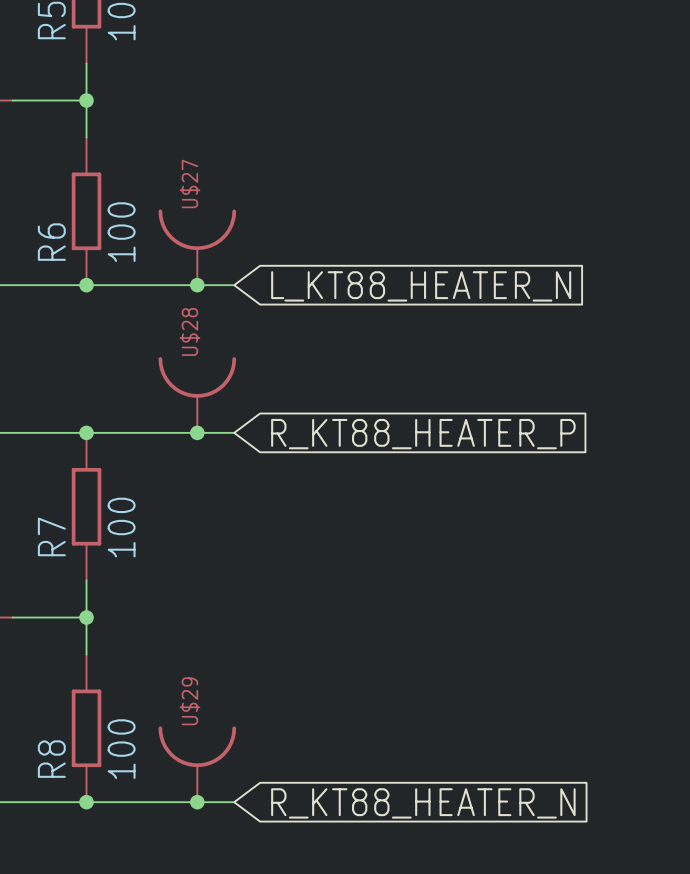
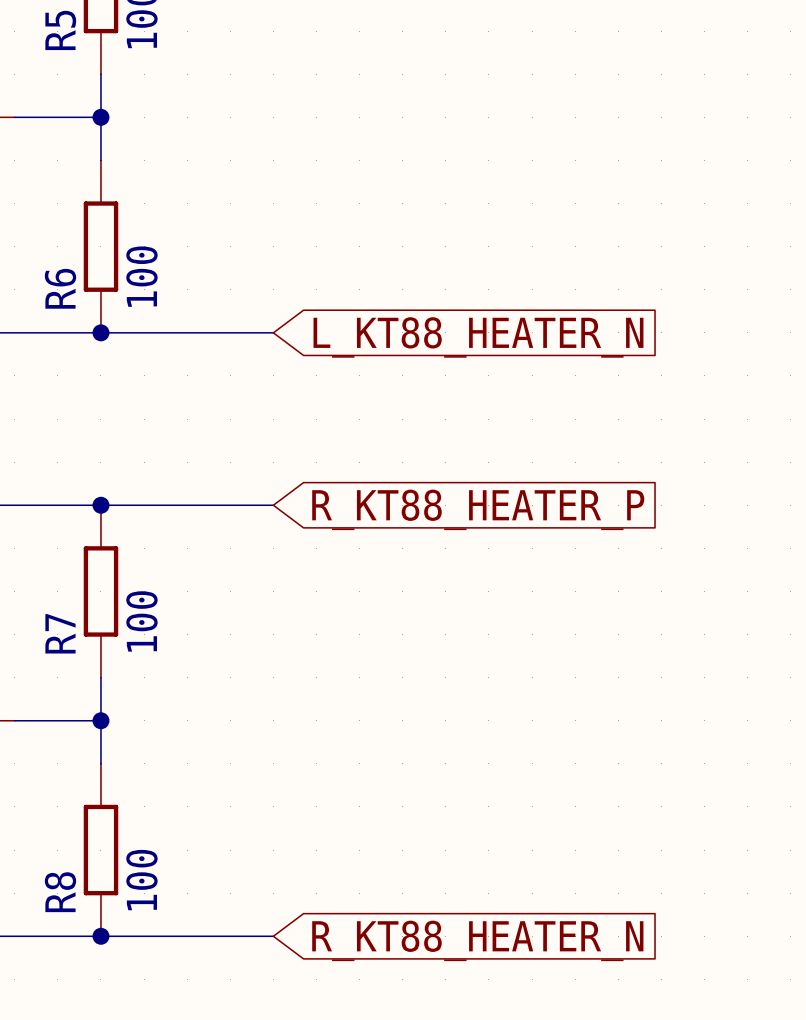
U$27: (197, 247) -> none
junction: (197, 285) -> none
U$28: (197, 395) -> none
junction: (197, 432) -> none
U$29: (197, 764) -> none
junction: (197, 802) -> none

